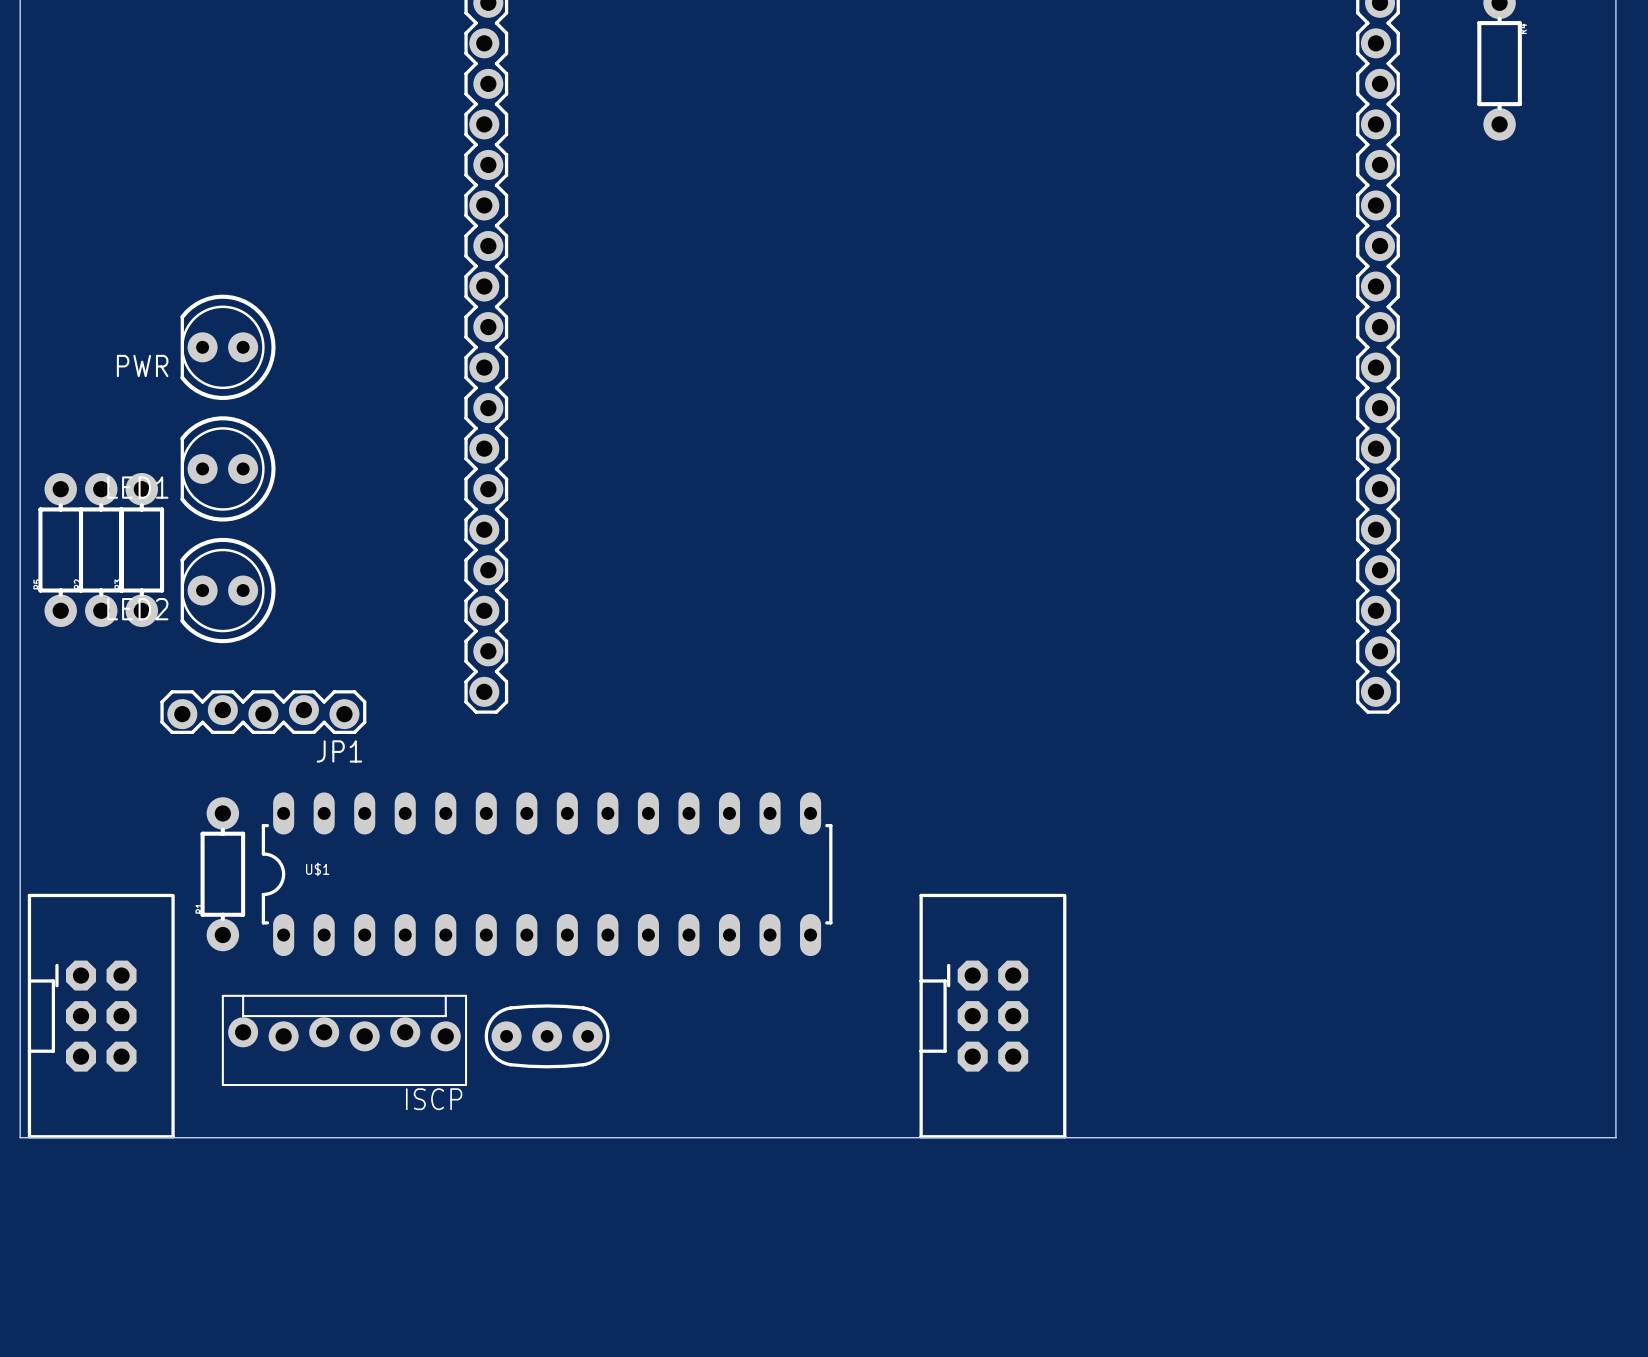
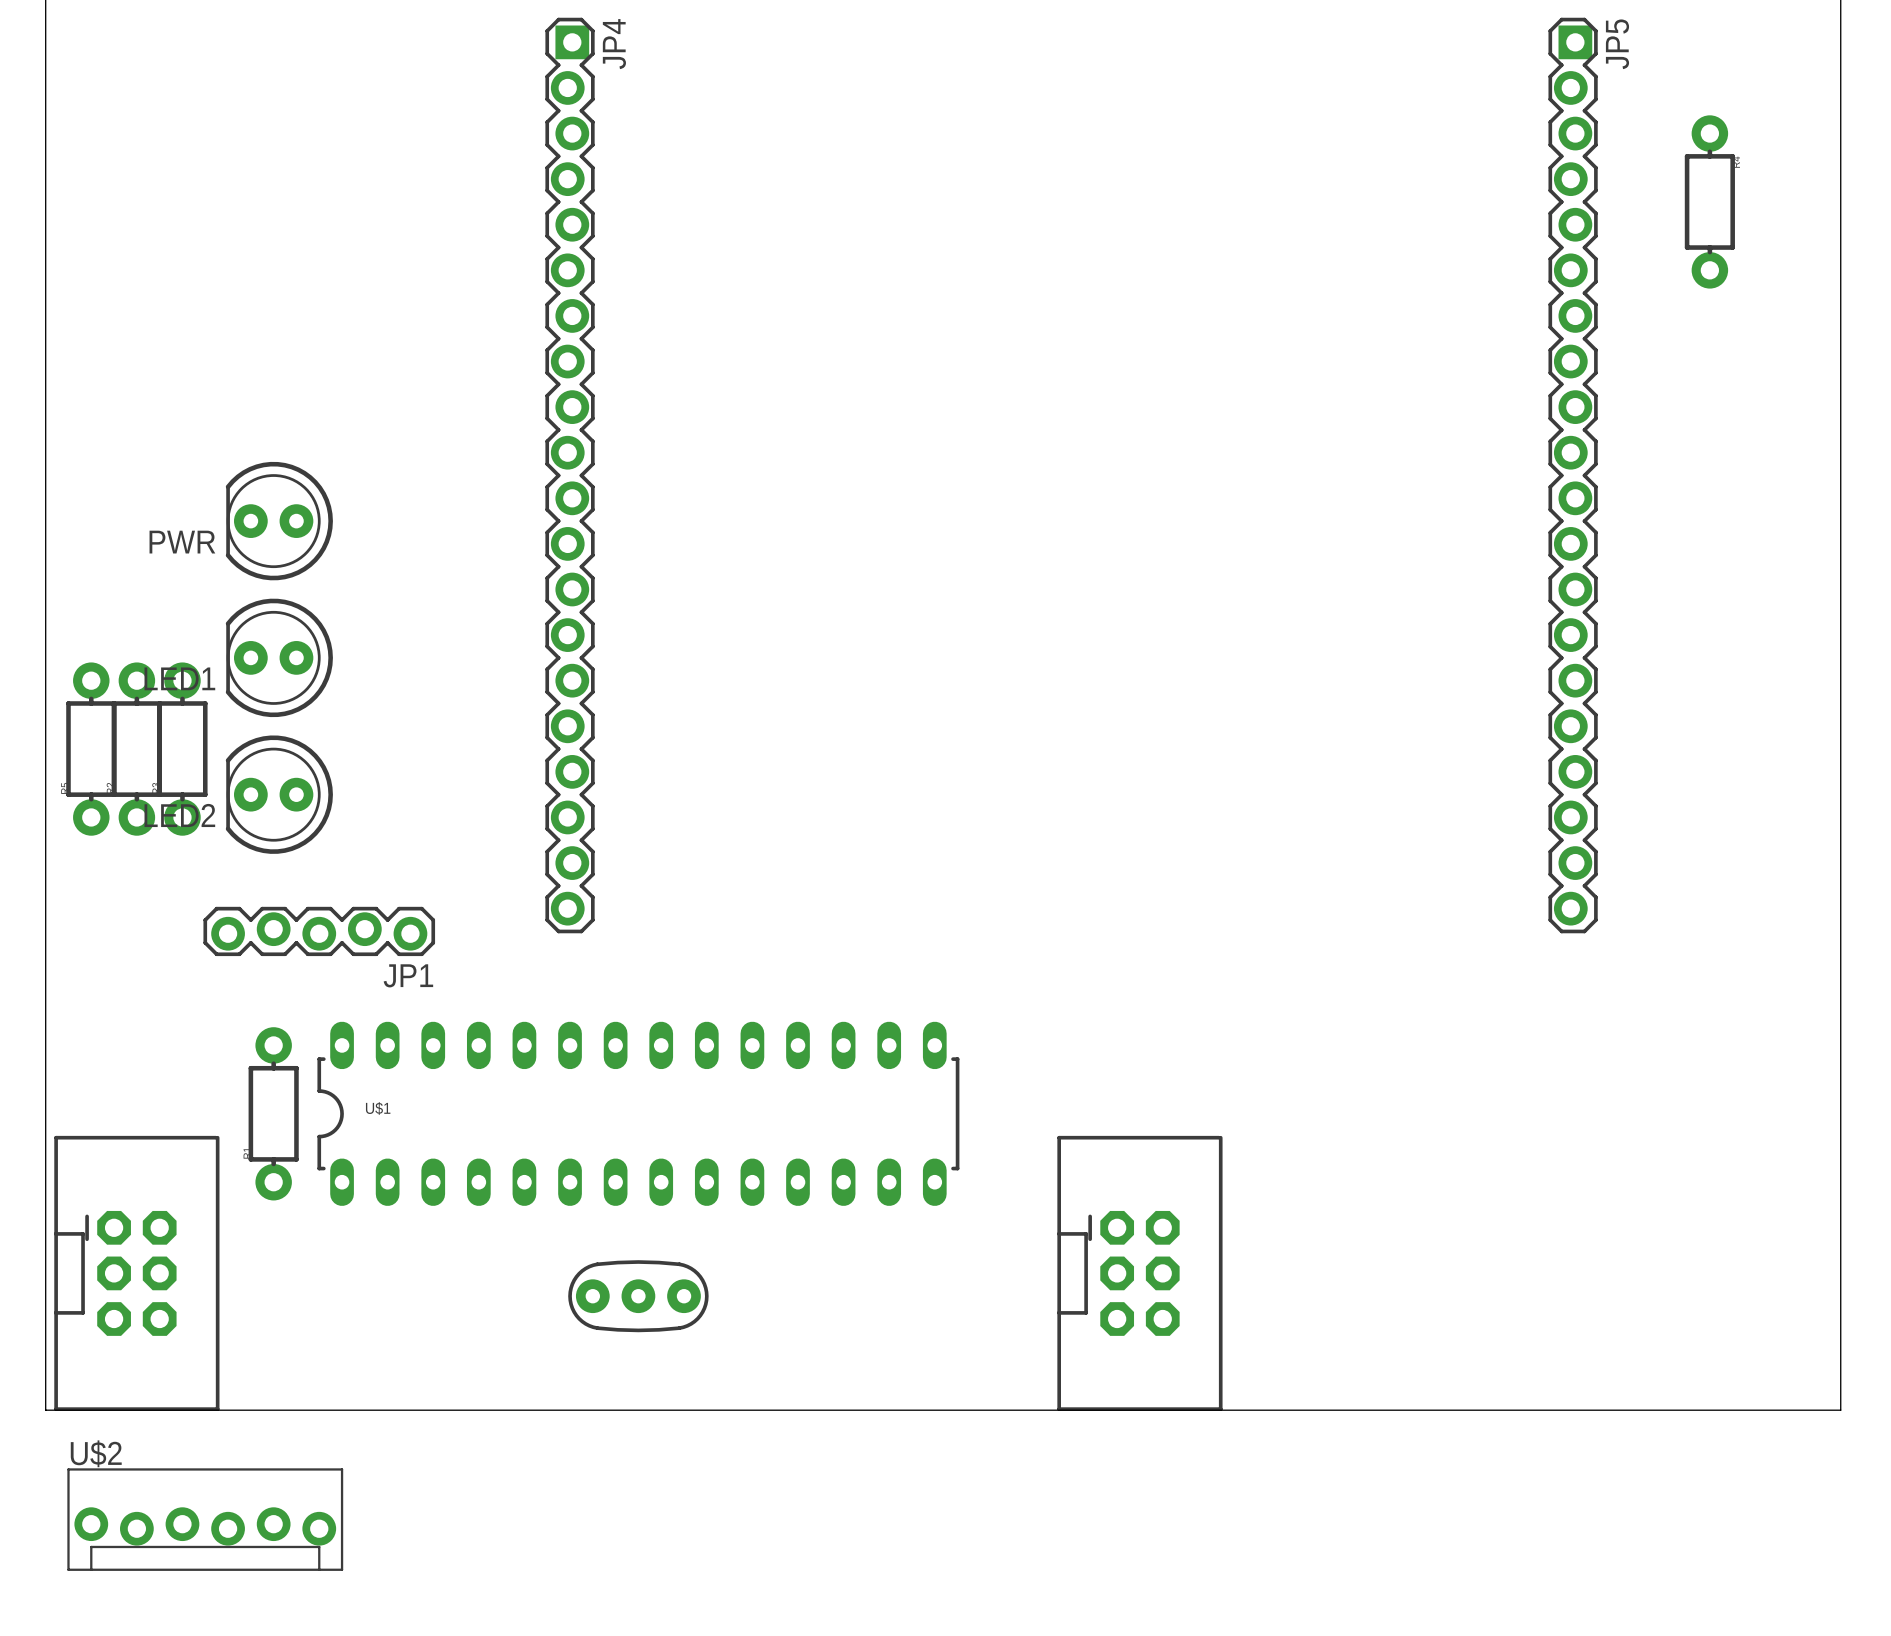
ISCP: (344, 1040) -> none
U$2: none -> (205, 1519)

